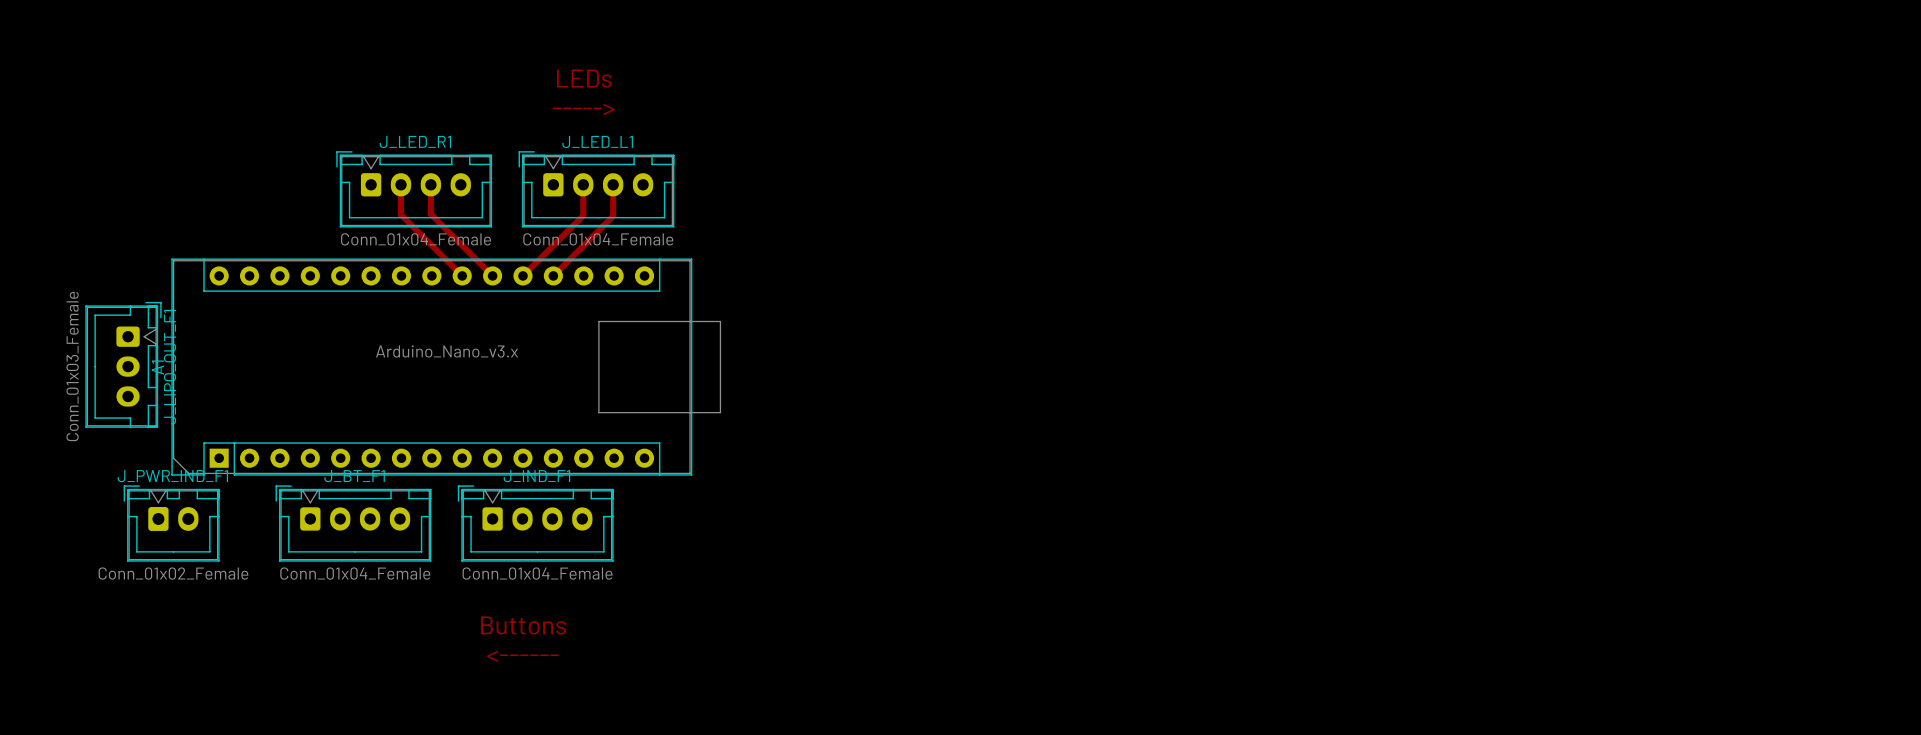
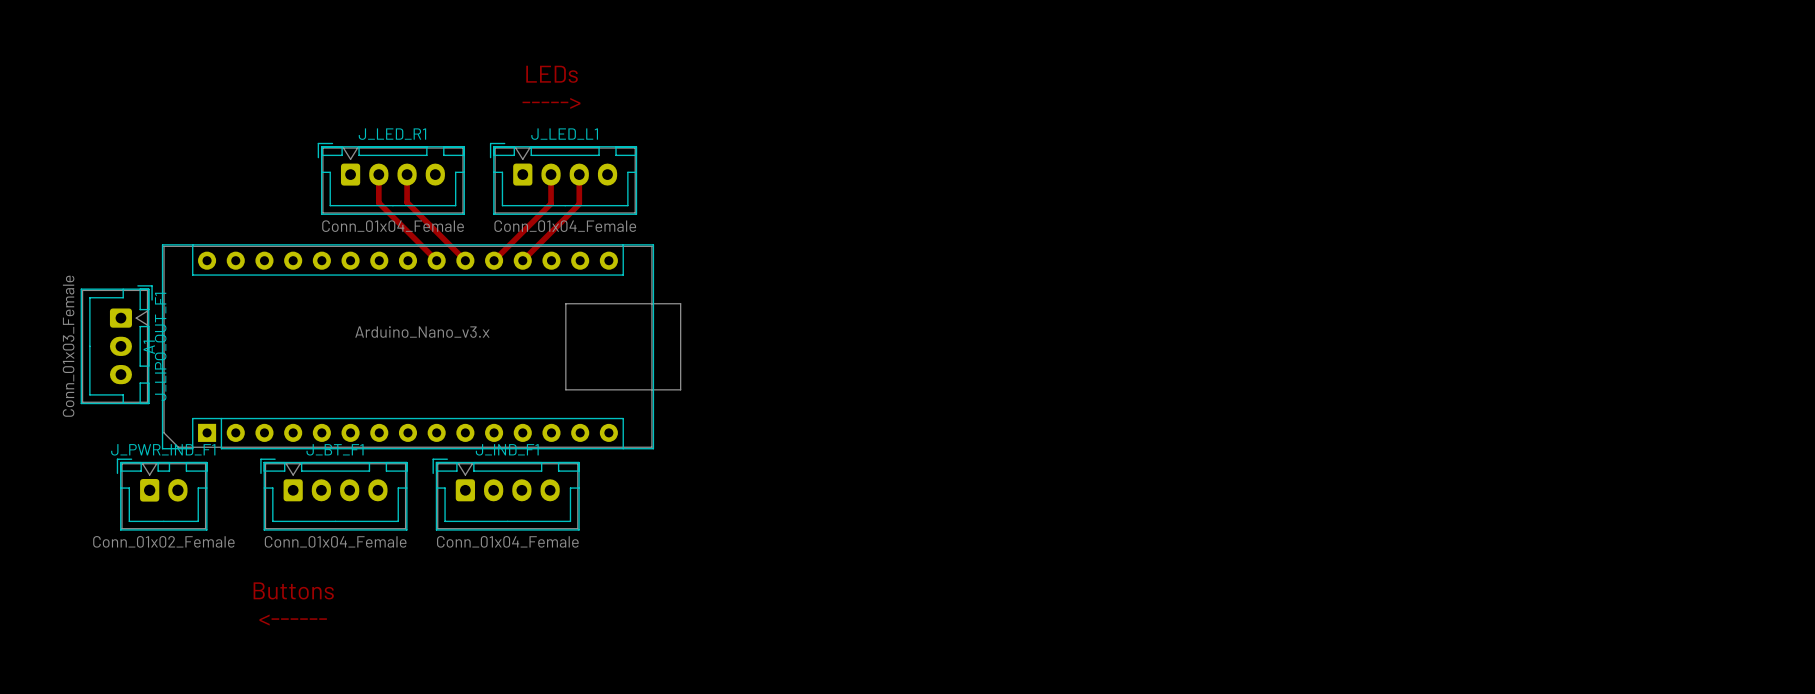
text position: Buttons (523, 625) -> Buttons (293, 590)
text position: <------ (522, 656) -> <------ (293, 620)

